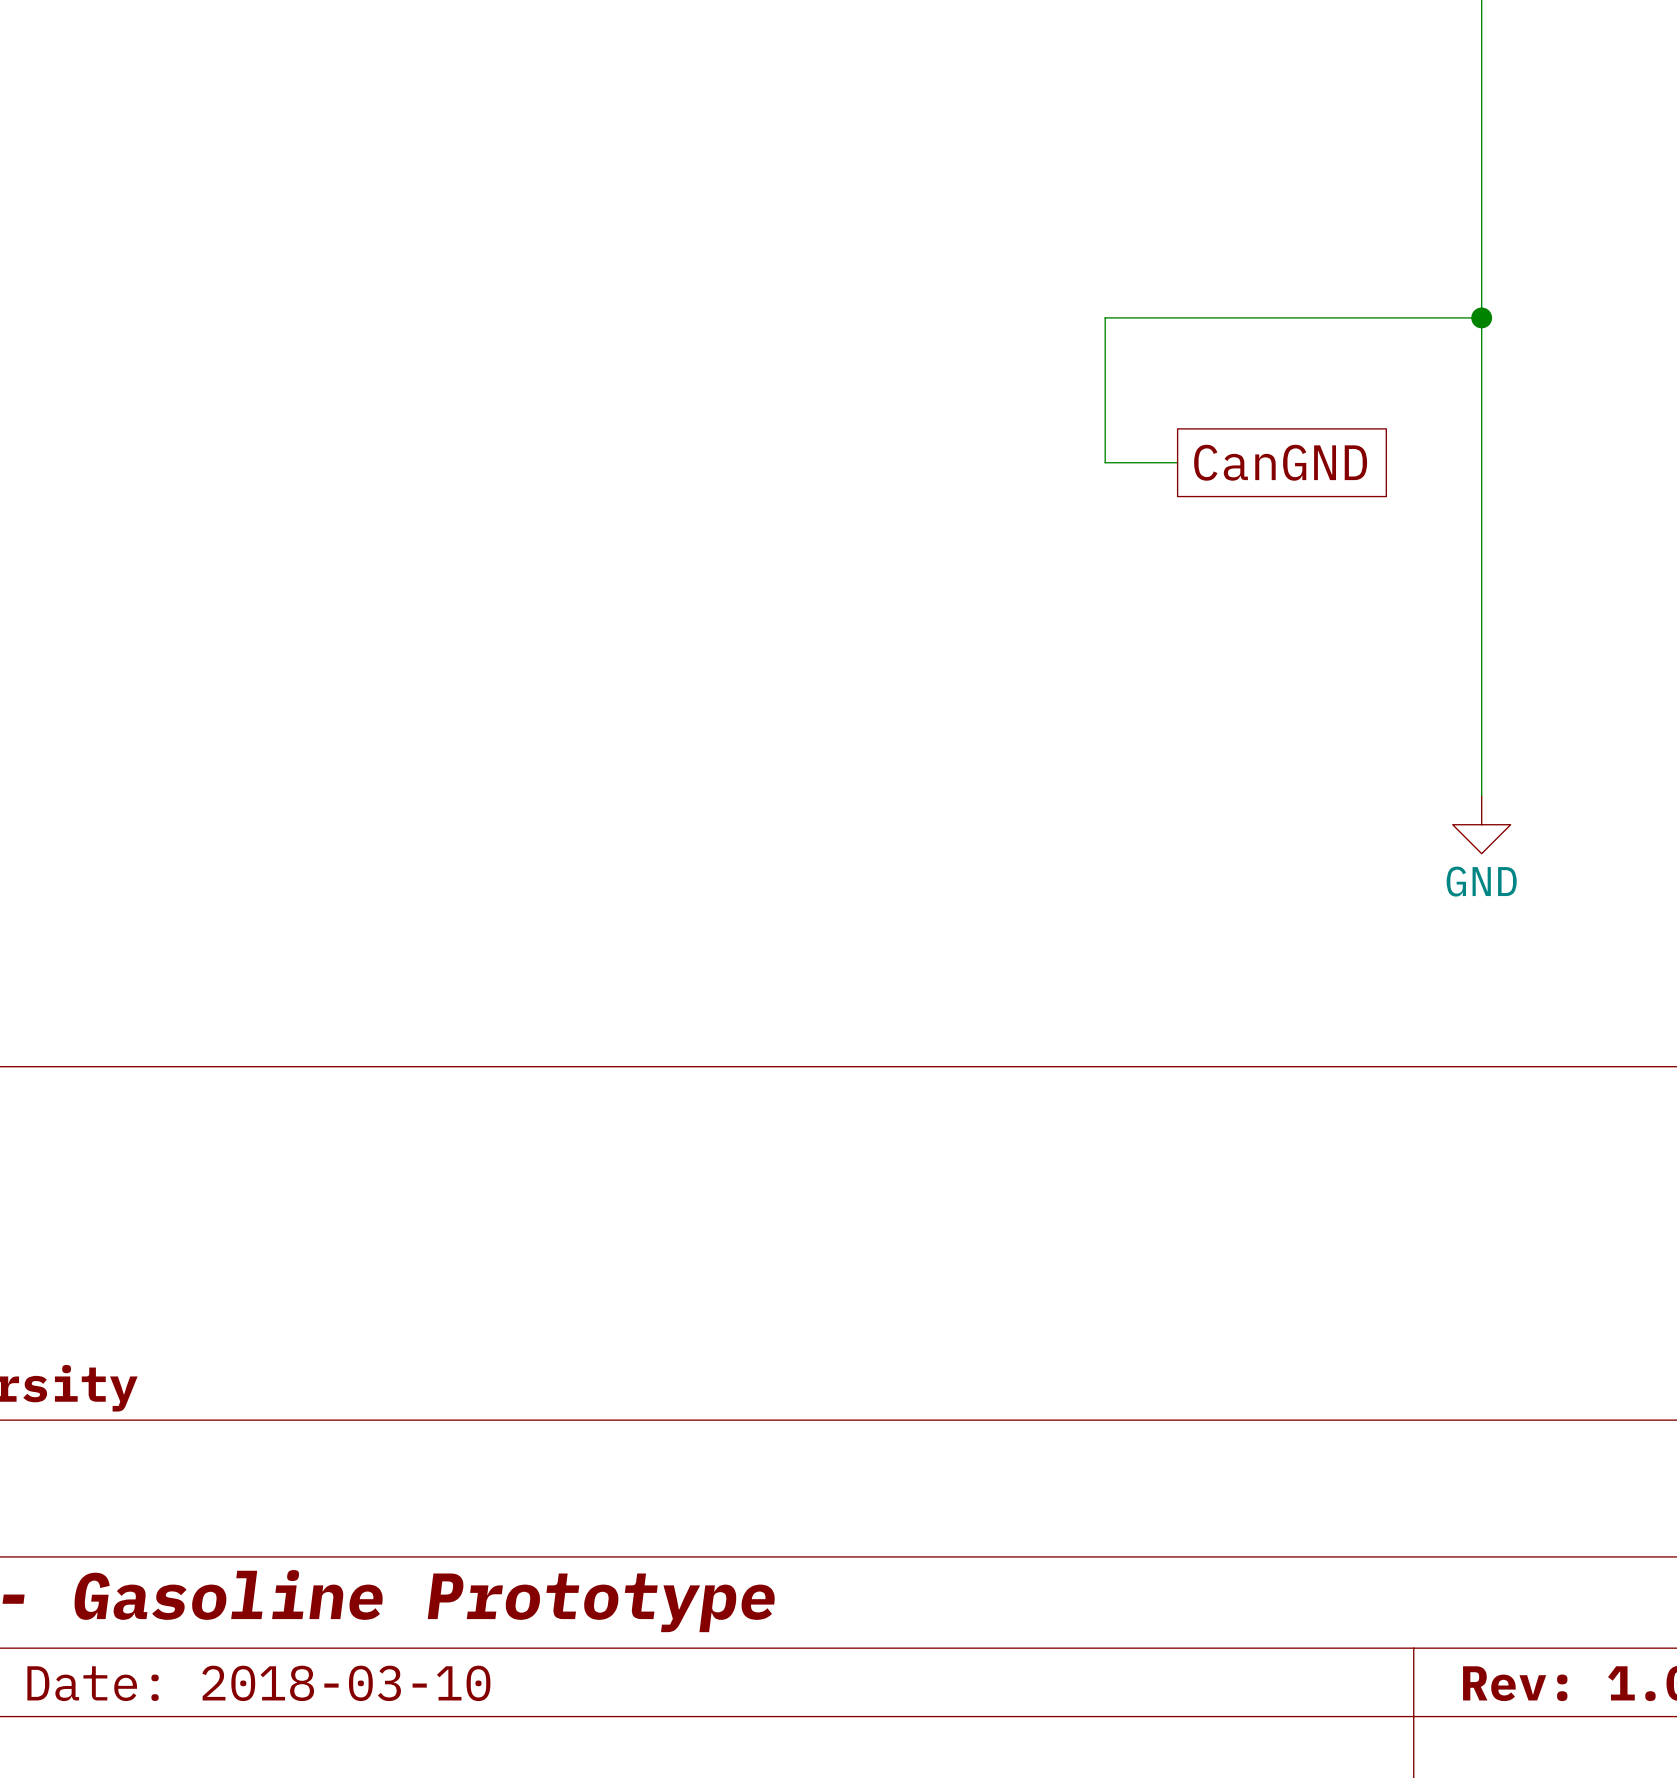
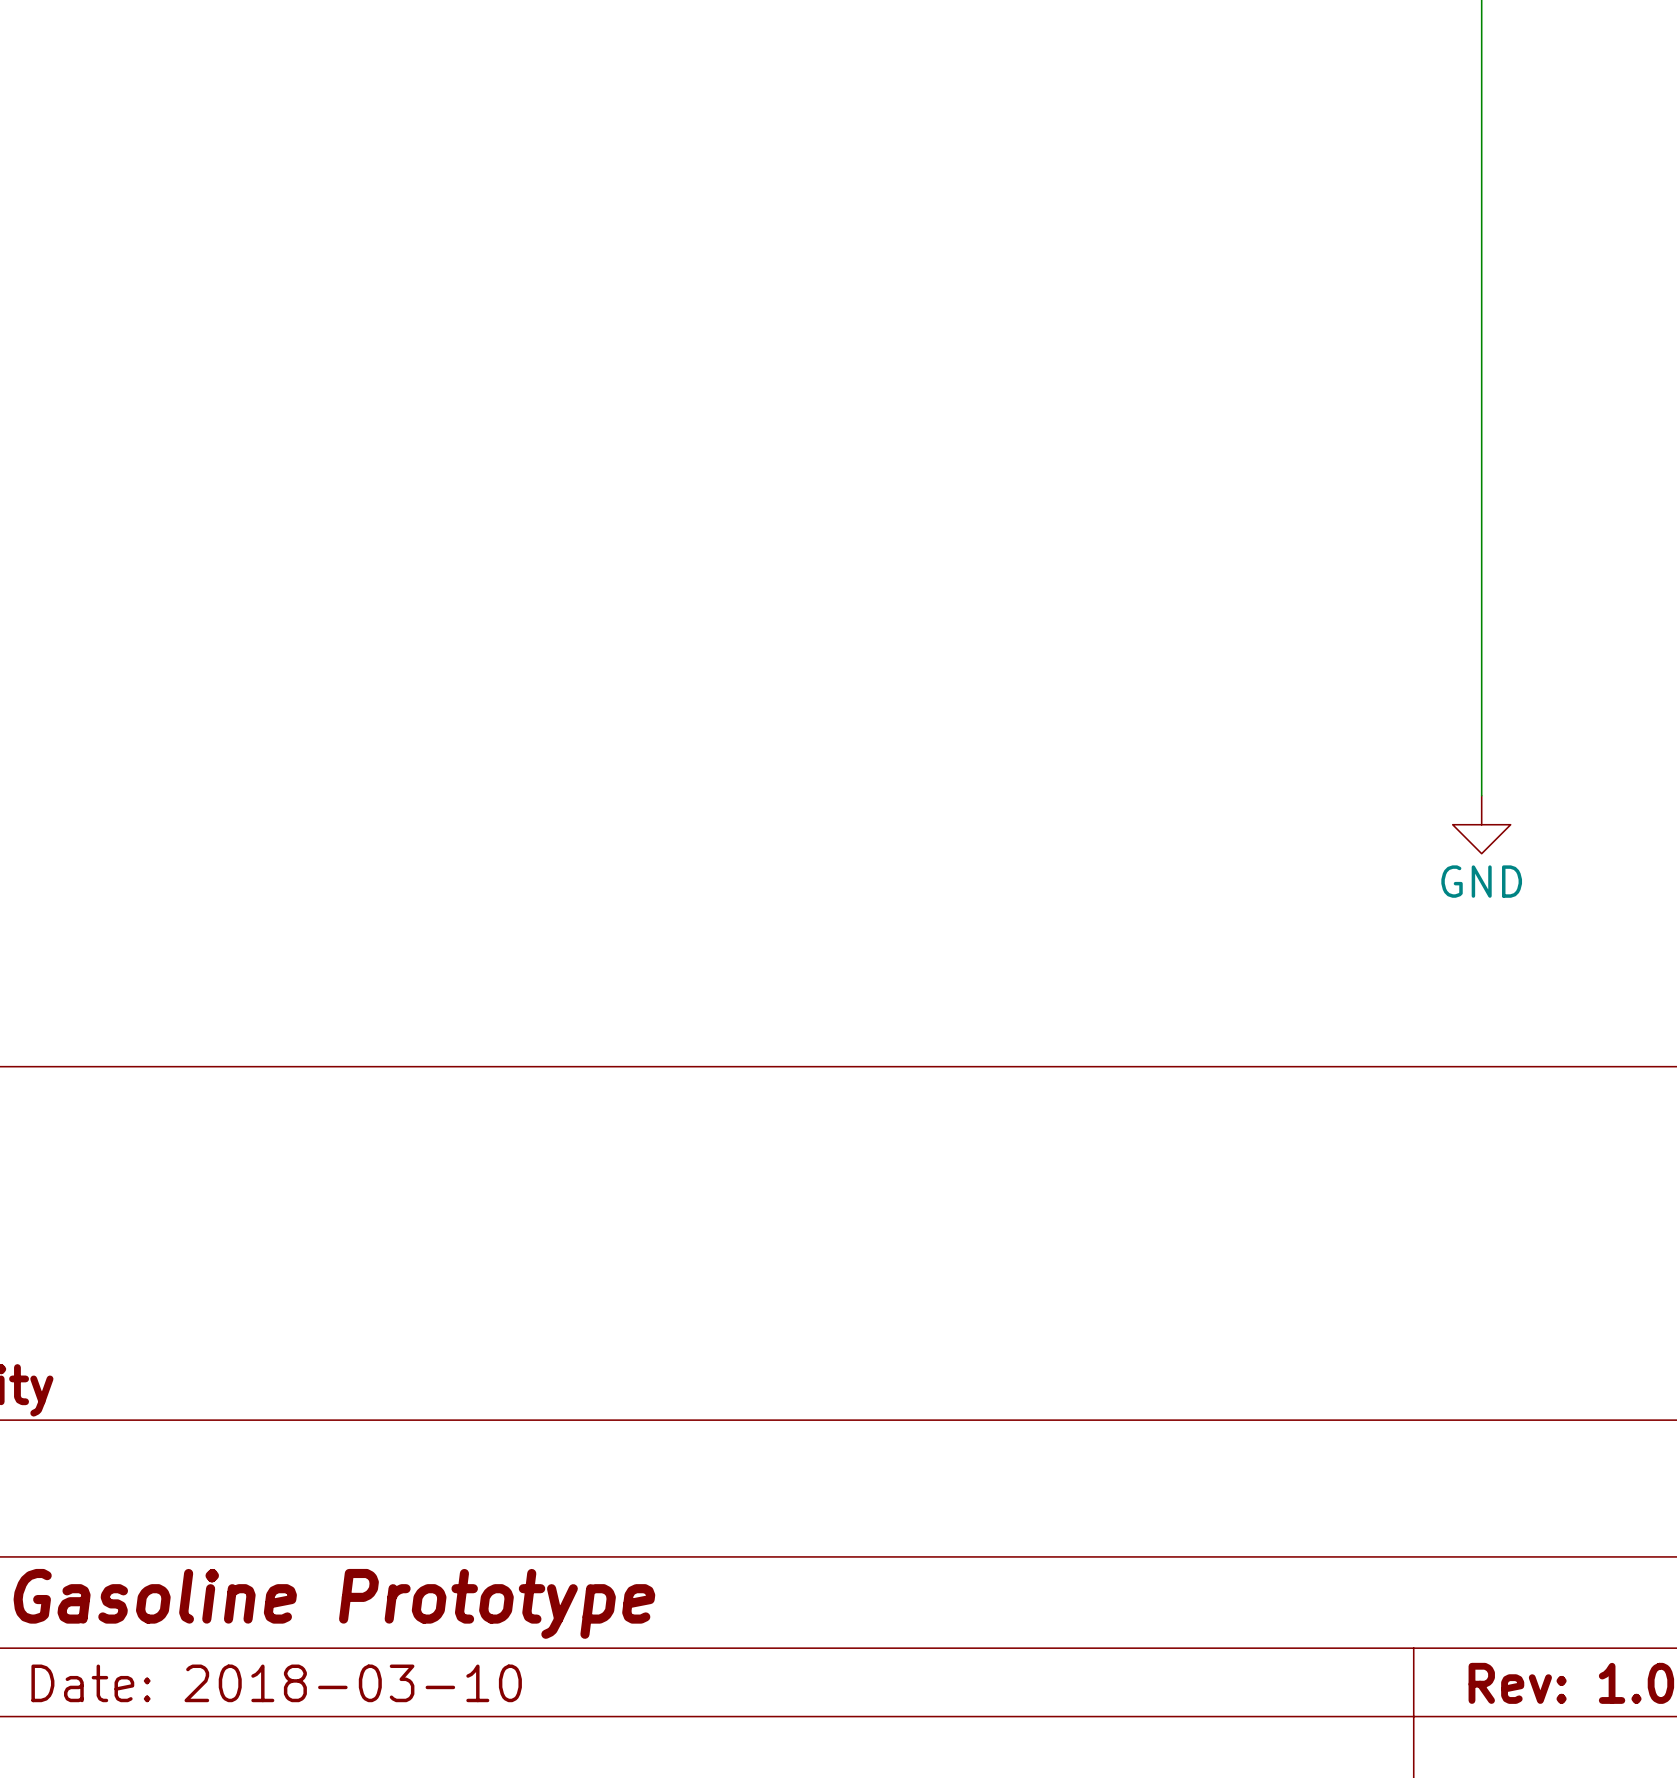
wire: (1481, 317) (1105, 317) (1105, 462) (1177, 462) -> none
junction: (1481, 317) -> none
global label: CanGND (1280, 462) -> none

